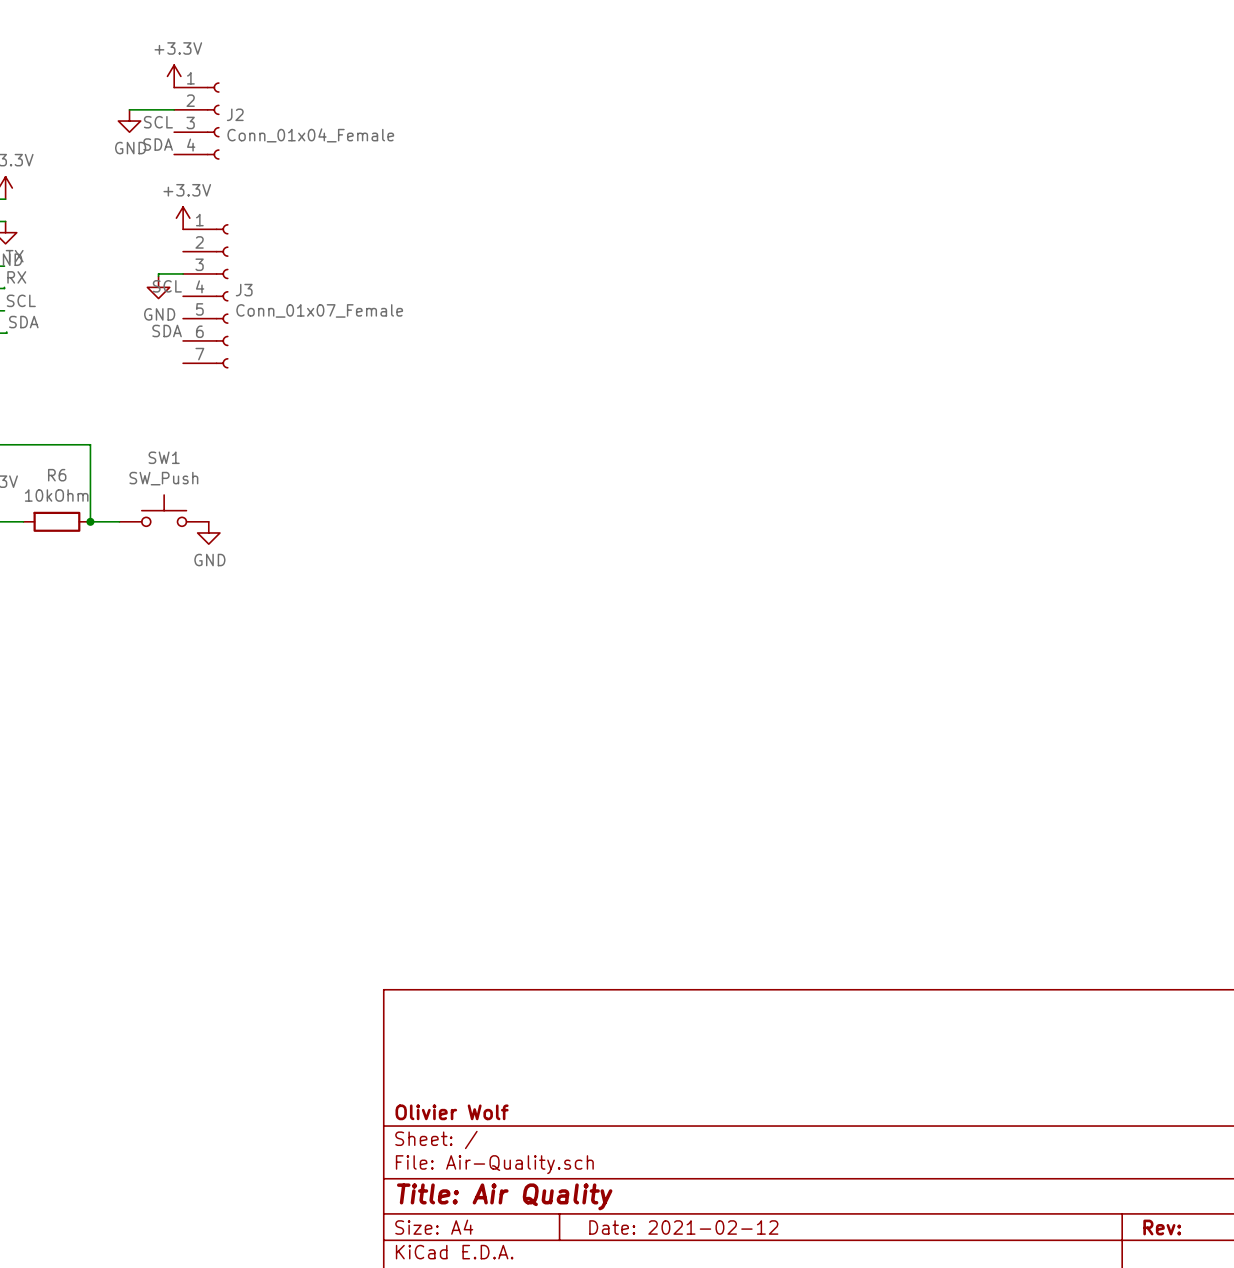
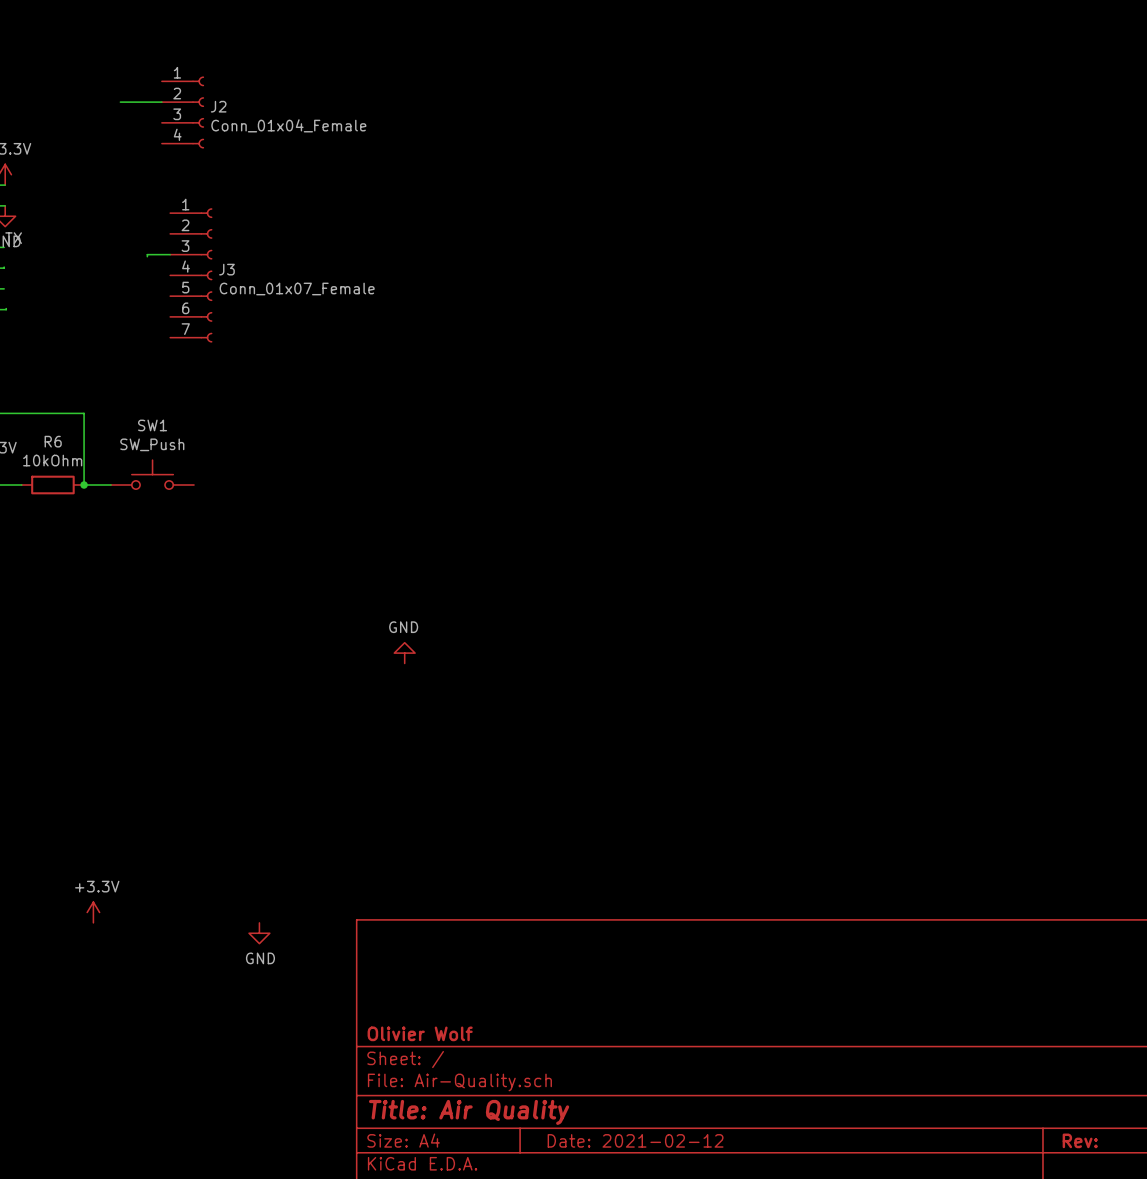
power symbol: +3.3V (174, 76) -> none
power symbol: GND (129, 121) -> none
label: SCL (158, 122) -> none
label: SDA (158, 144) -> none
power symbol: +3.3V (183, 218) -> none
label: RX (16, 277) -> none
label: SCL (167, 286) -> none
power symbol: GND (158, 287) -> none
label: SCL (21, 300) -> none
label: SDA (23, 322) -> none
label: SDA (167, 331) -> none
power symbol: GND (208, 532) -> none
power symbol: none -> GND (404, 653)
power symbol: none -> +3.3V (93, 912)
power symbol: none -> GND (259, 933)

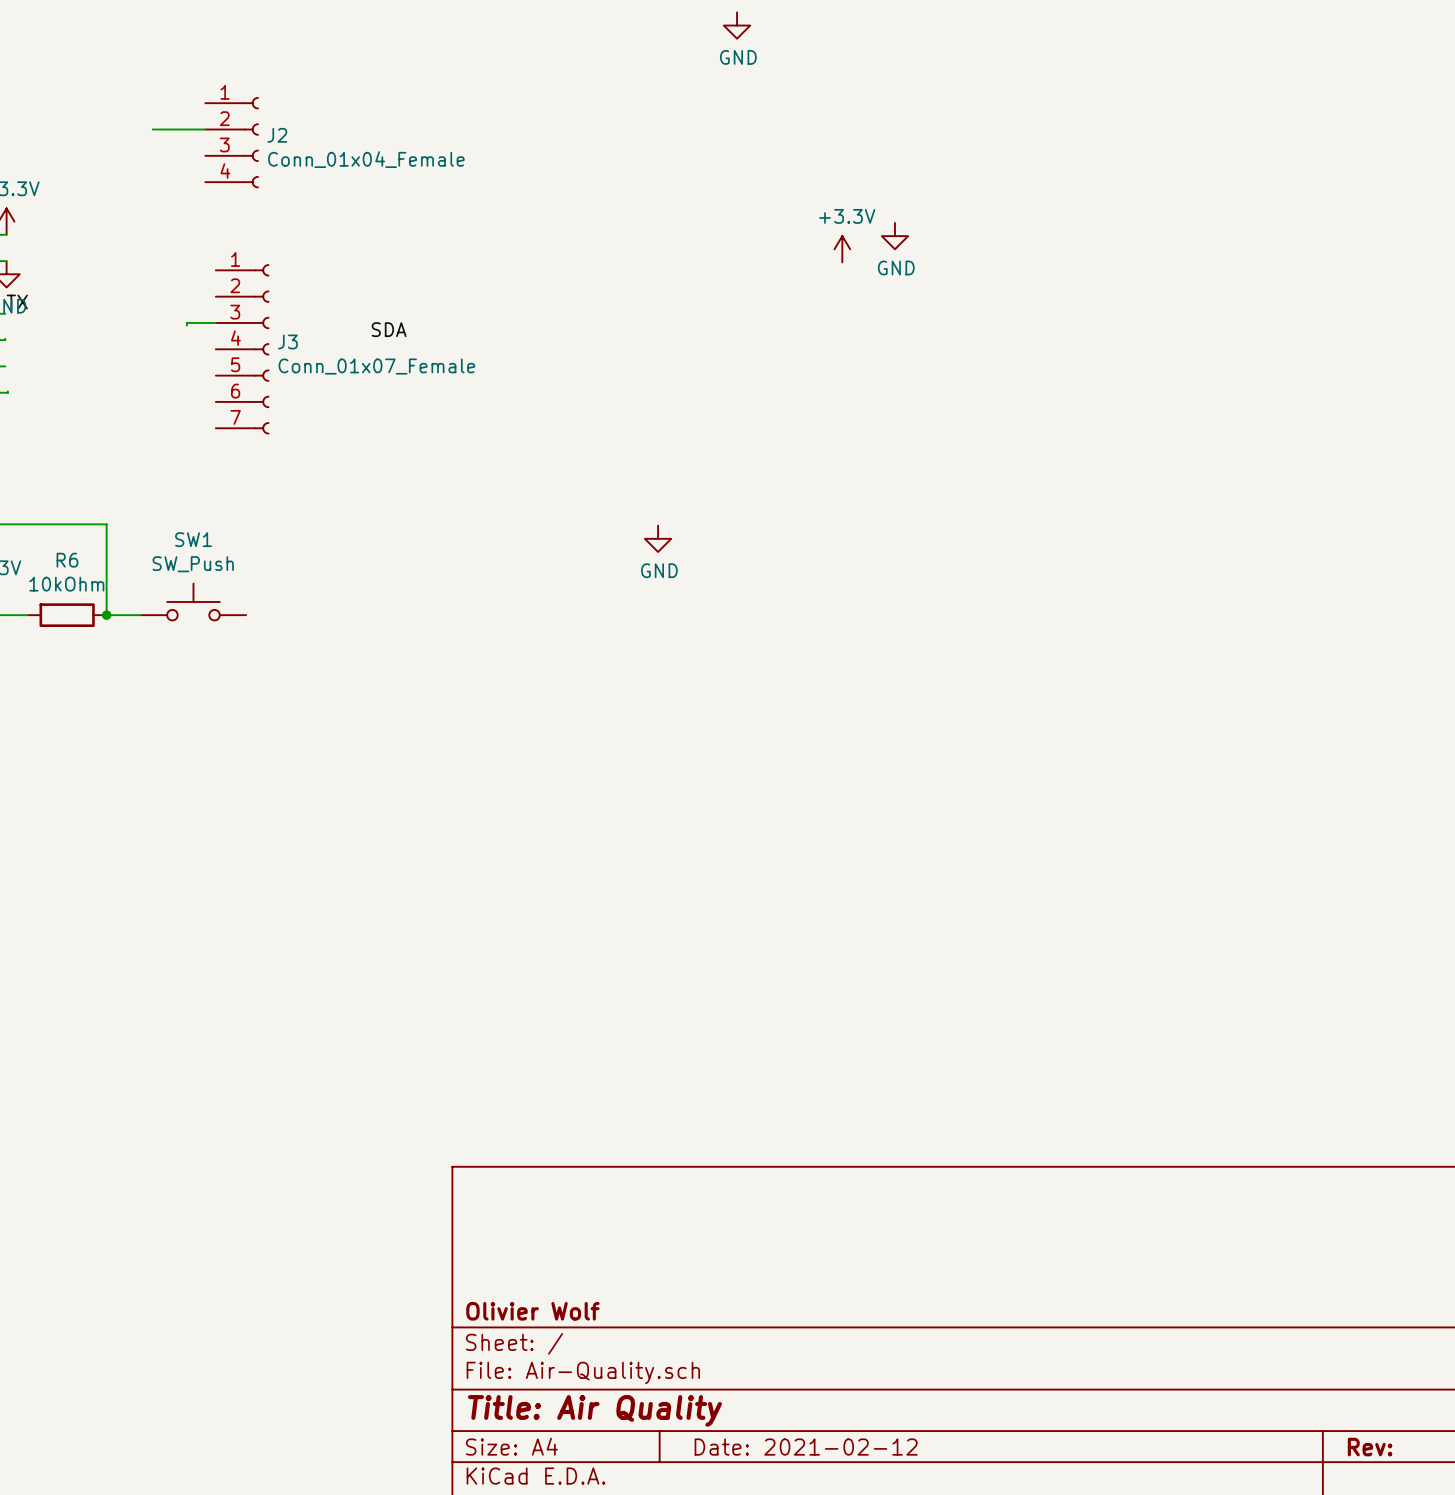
power symbol: none -> GND (737, 25)
power symbol: none -> GND (894, 236)
power symbol: none -> +3.3V (842, 249)
label: none -> SDA (389, 329)
power symbol: none -> GND (658, 538)
power symbol: GND (404, 653) -> none
power symbol: +3.3V (93, 912) -> none
power symbol: GND (259, 933) -> none

